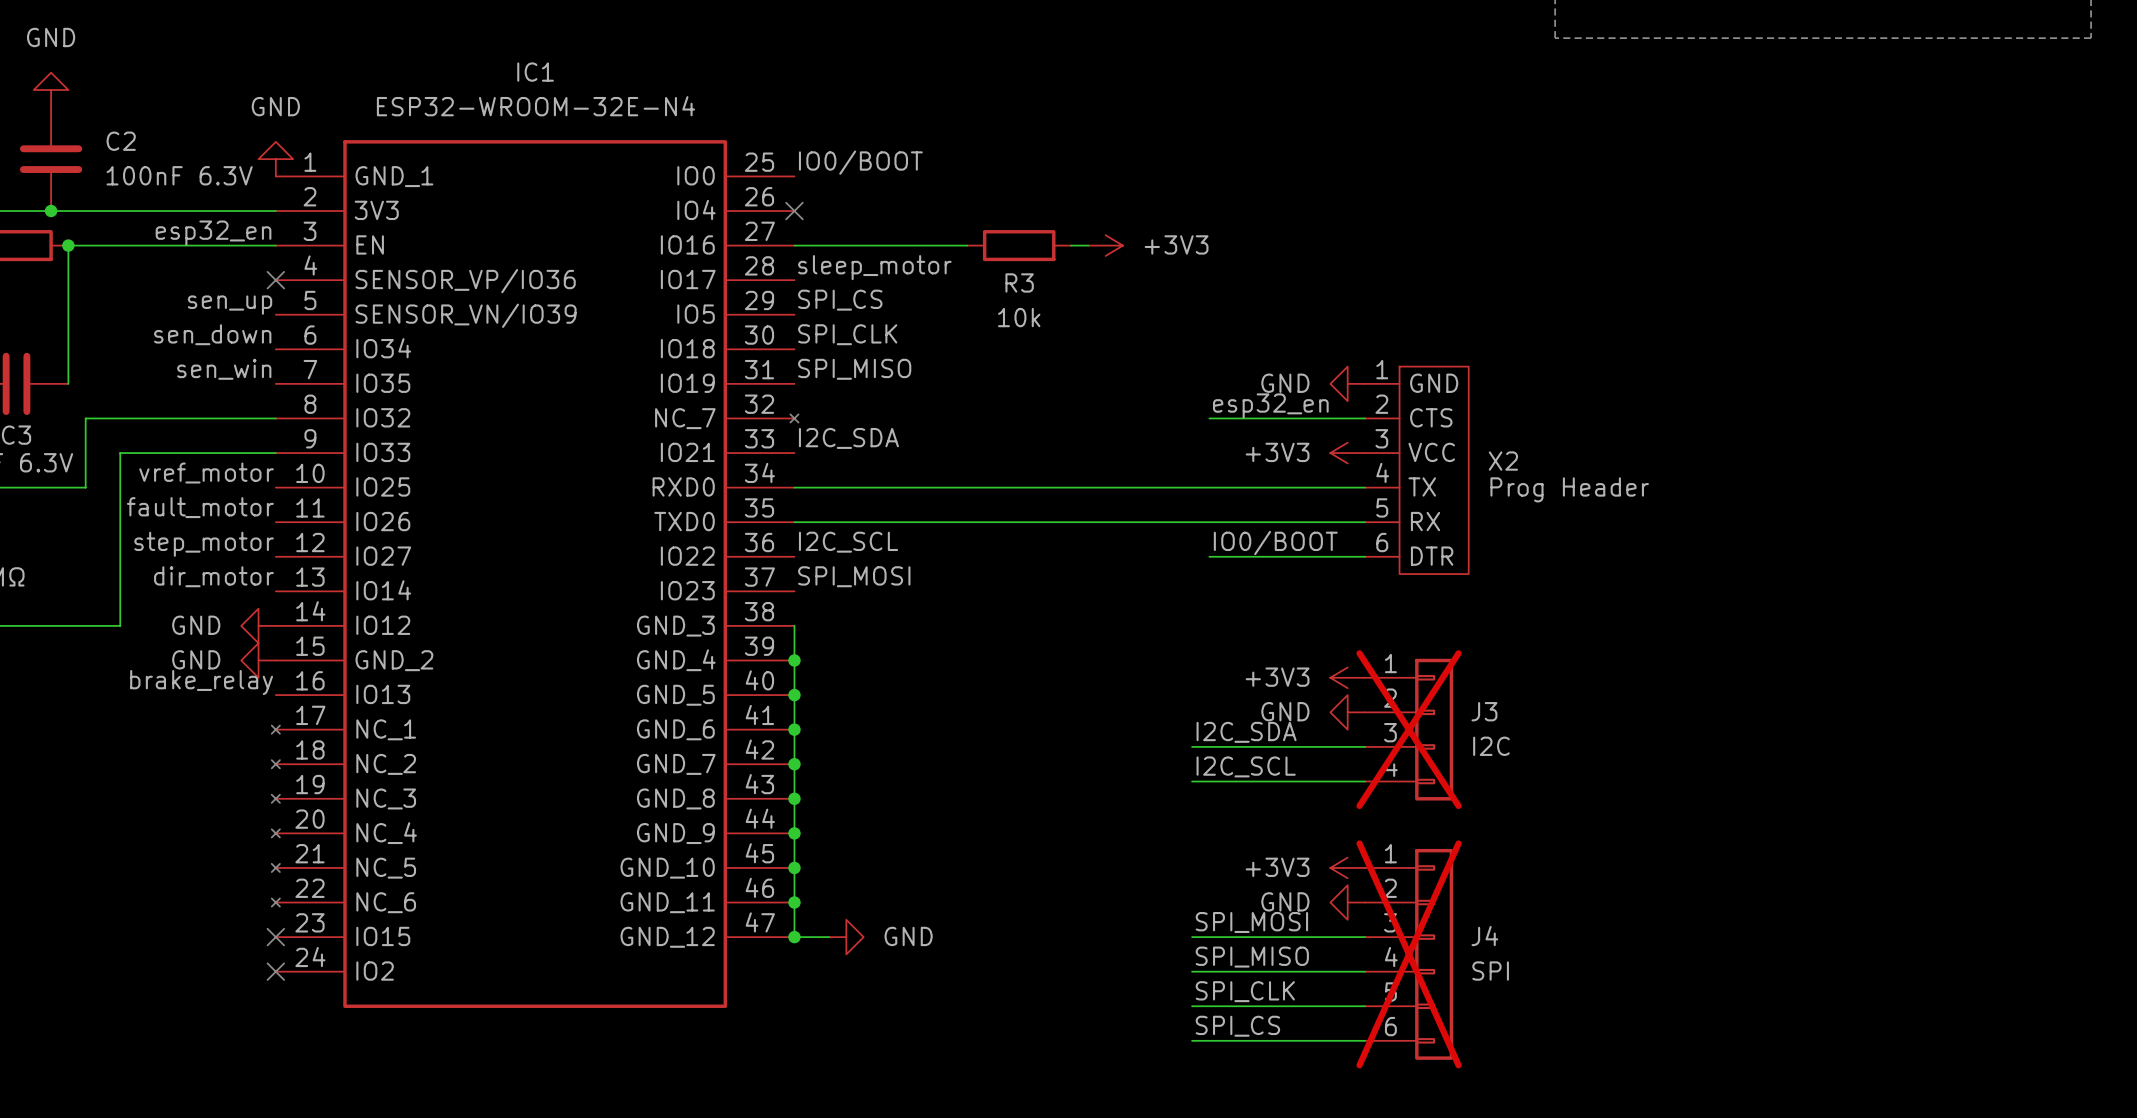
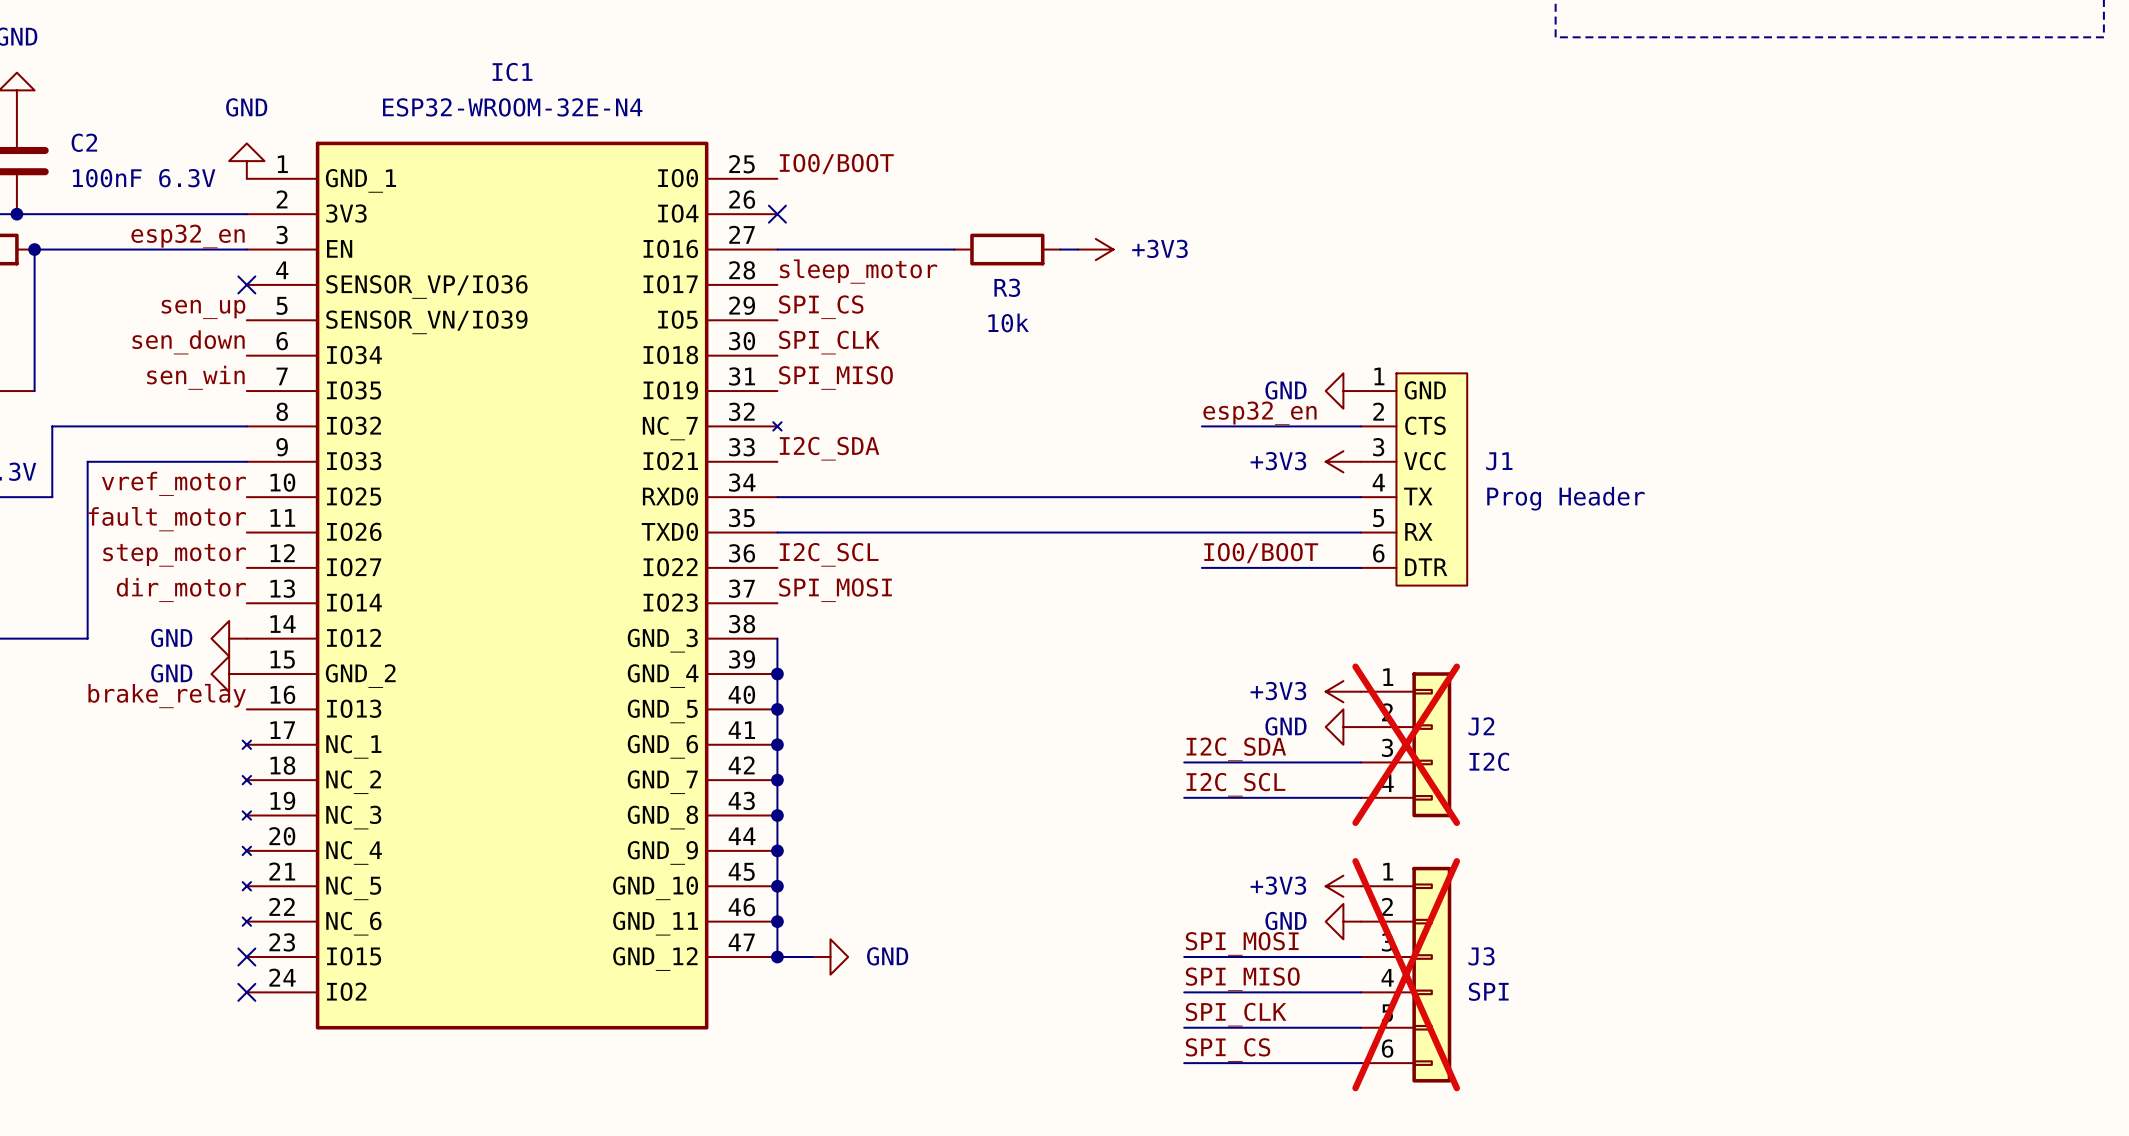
X2 name: X2 (1503, 461) -> J1 (1499, 461)
J3 name: J3 (1484, 711) -> J2 (1481, 726)
J4 name: J4 (1484, 936) -> J3 (1481, 956)

